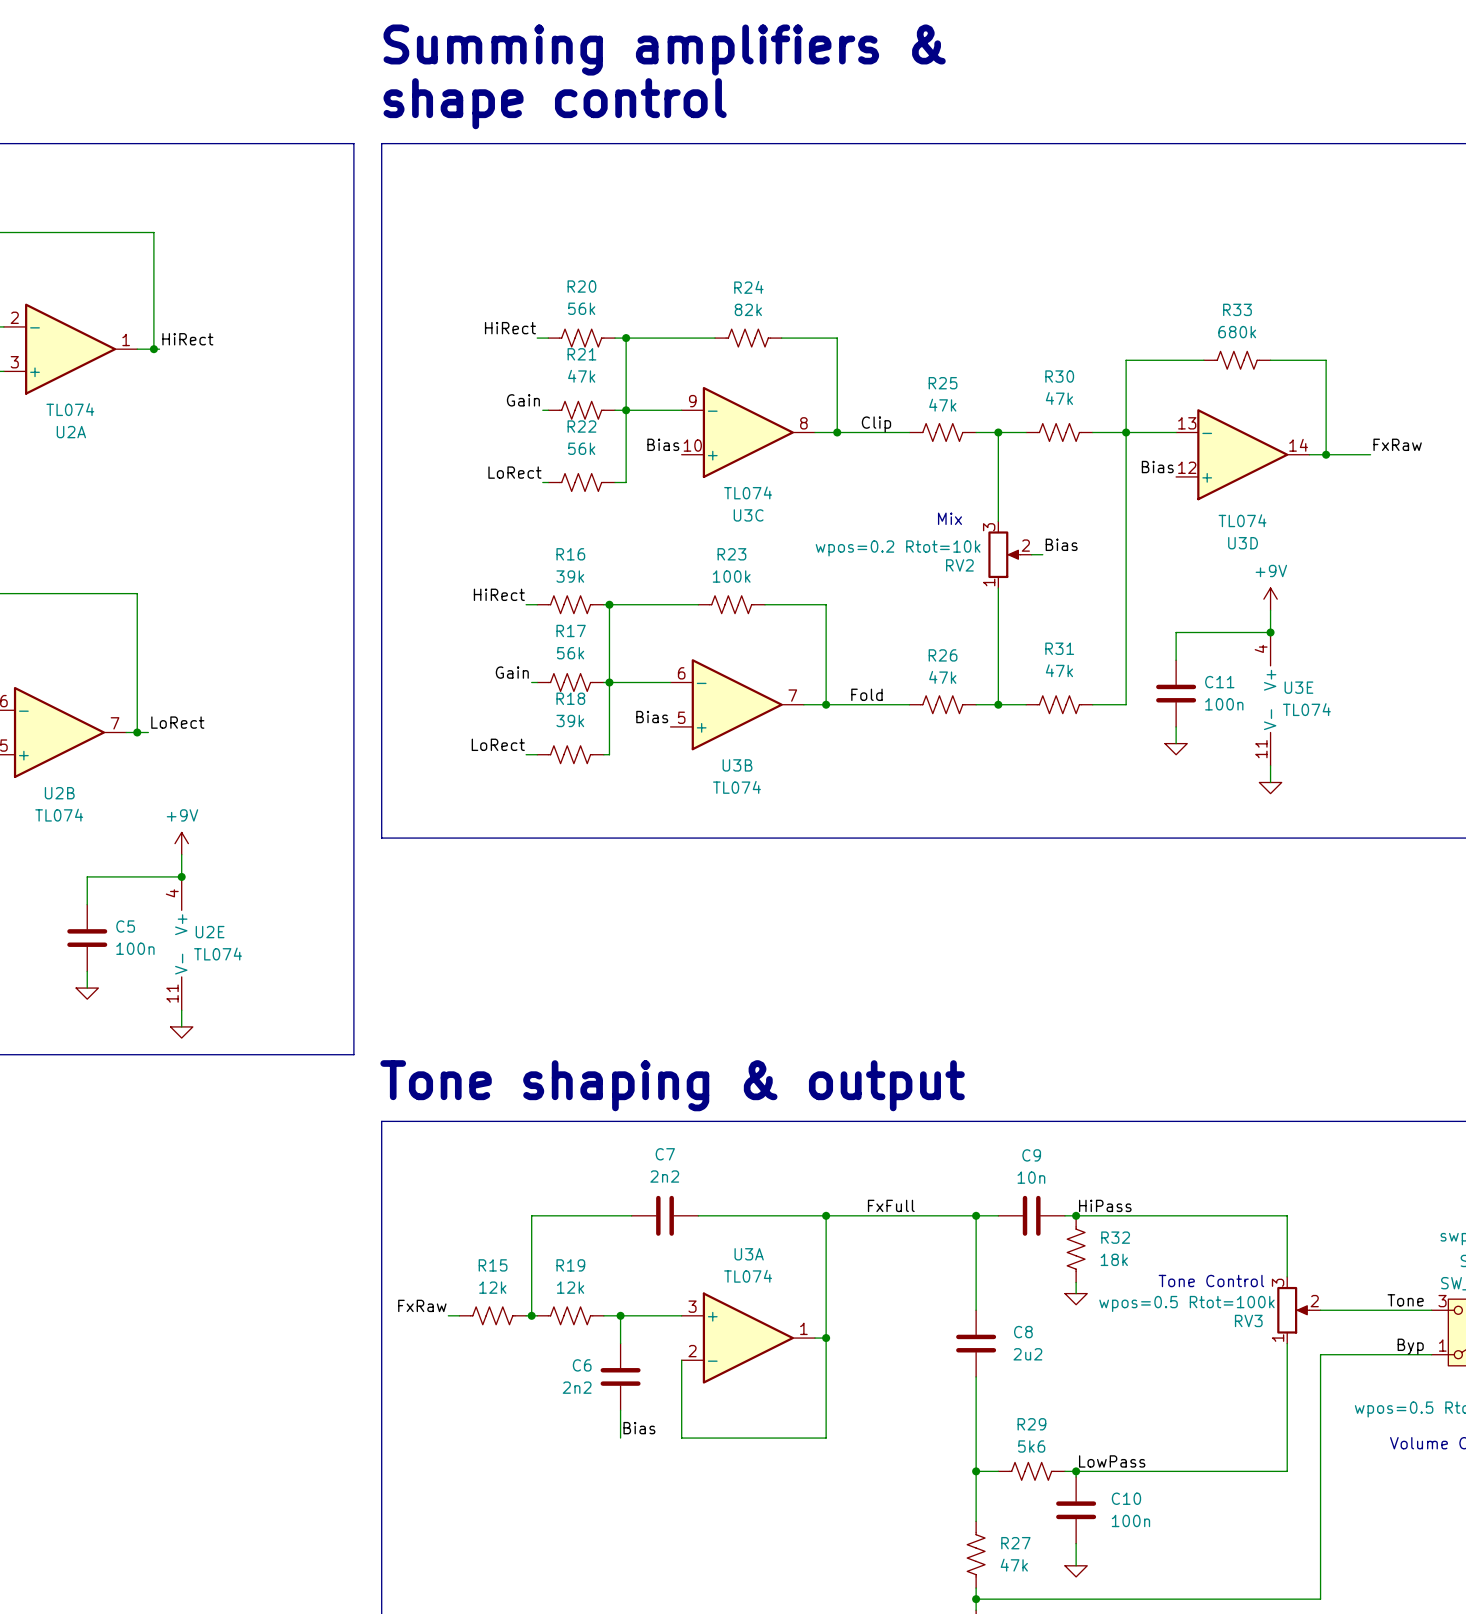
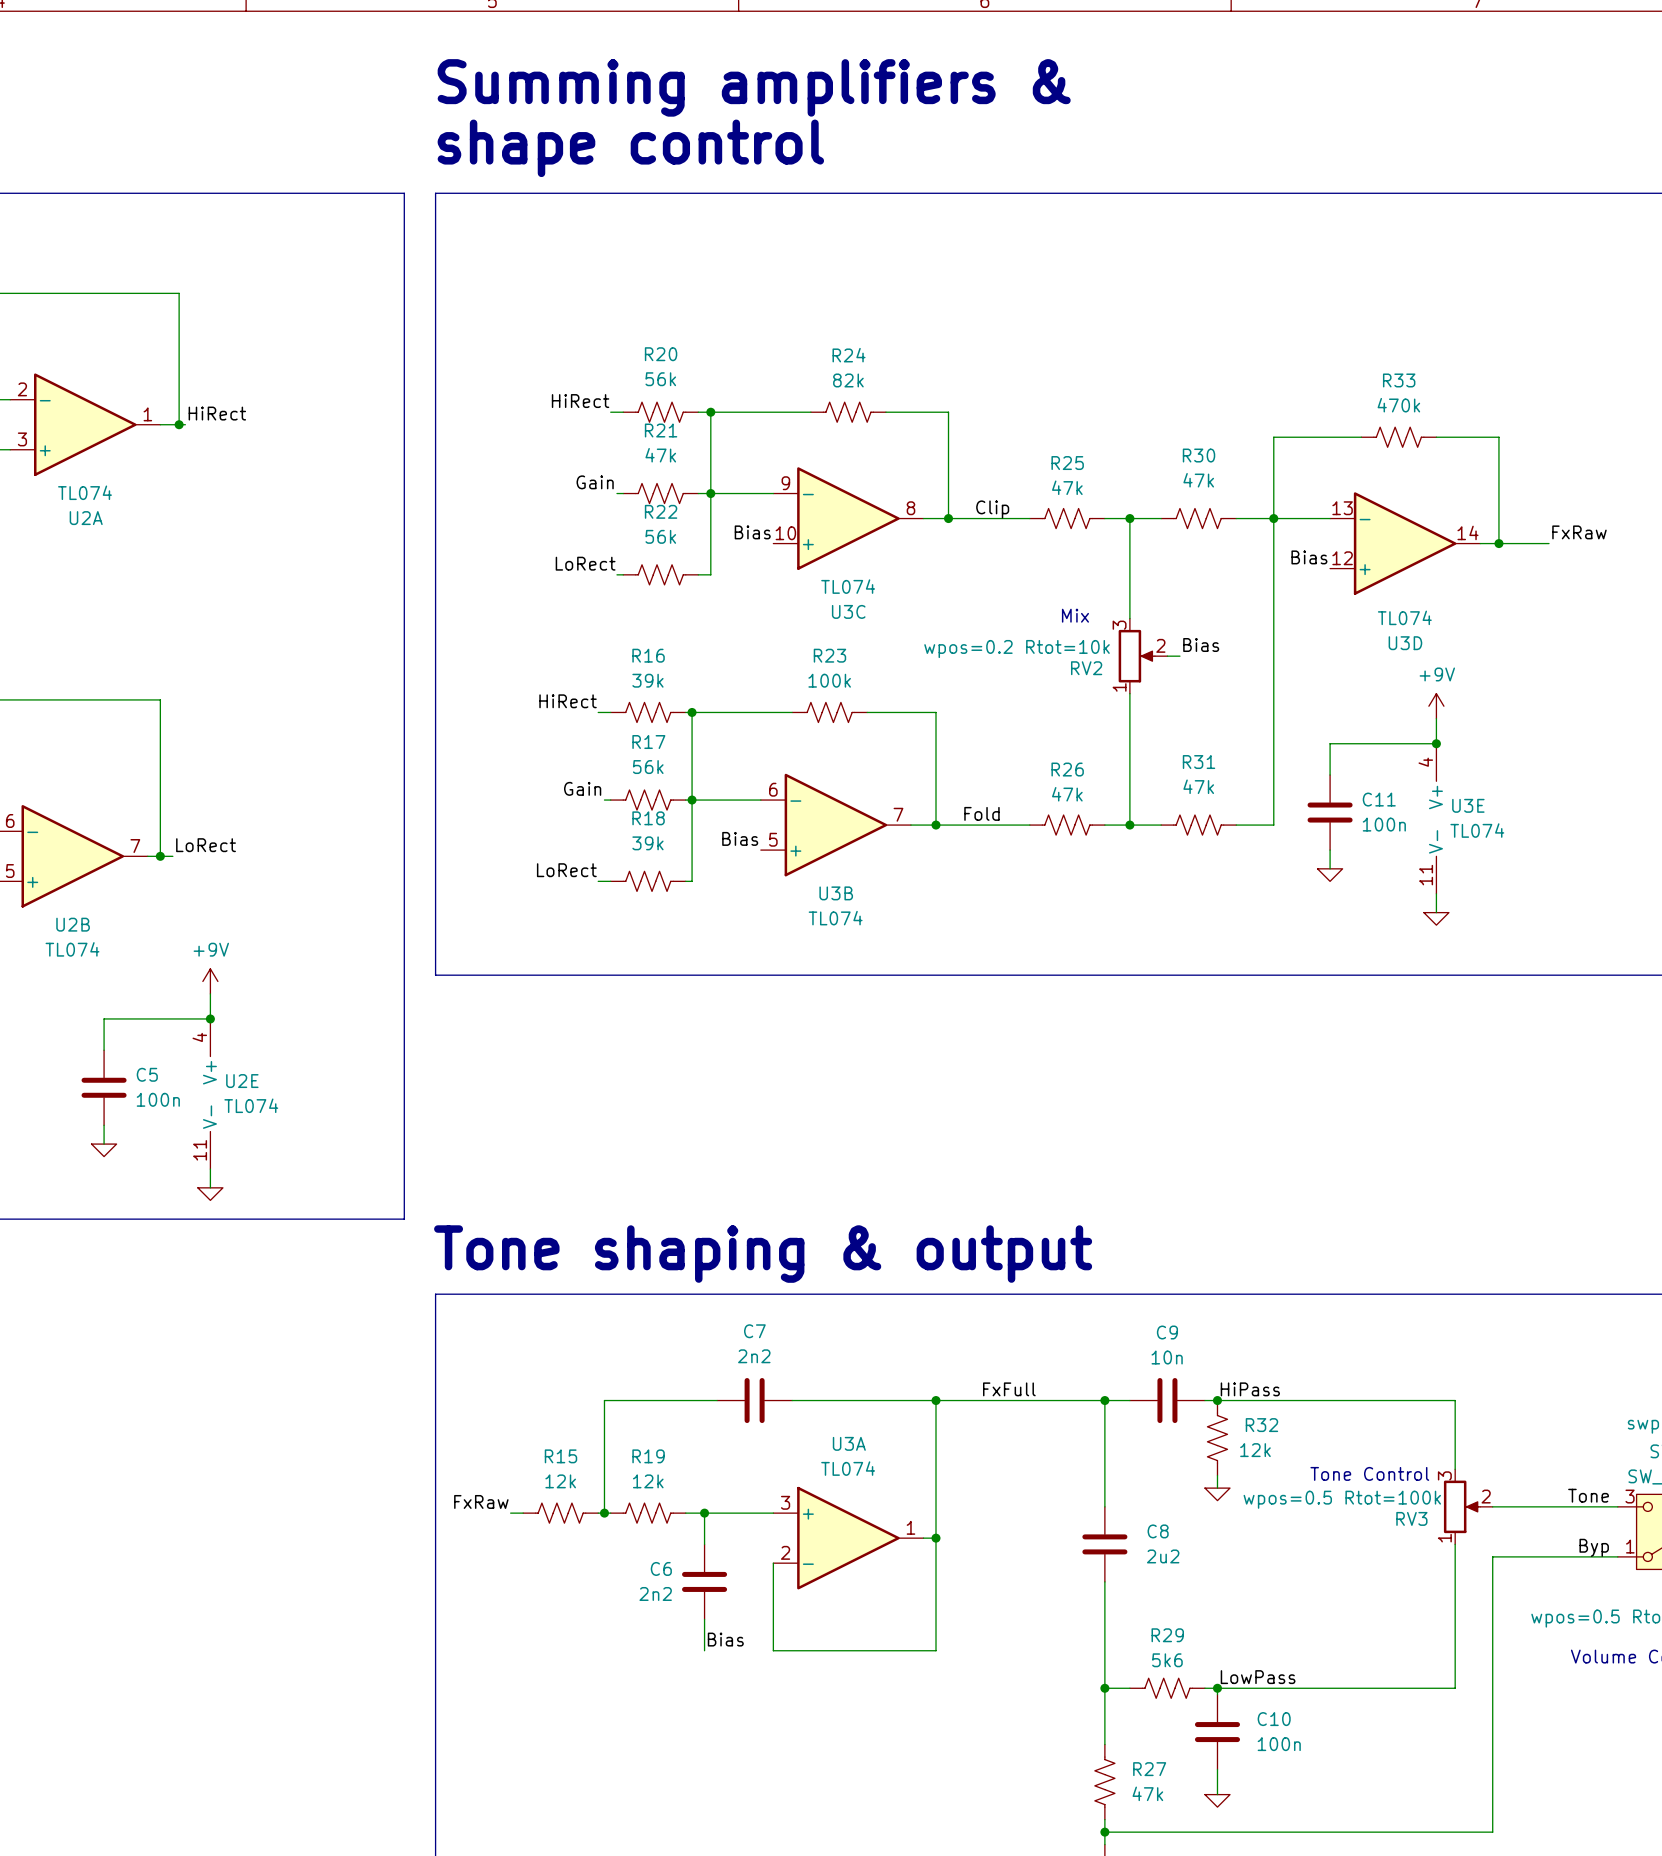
R33 value: 680k (1237, 332) -> 470k (1398, 405)
R32 value: 18k (1114, 1259) -> 12k (1255, 1450)

